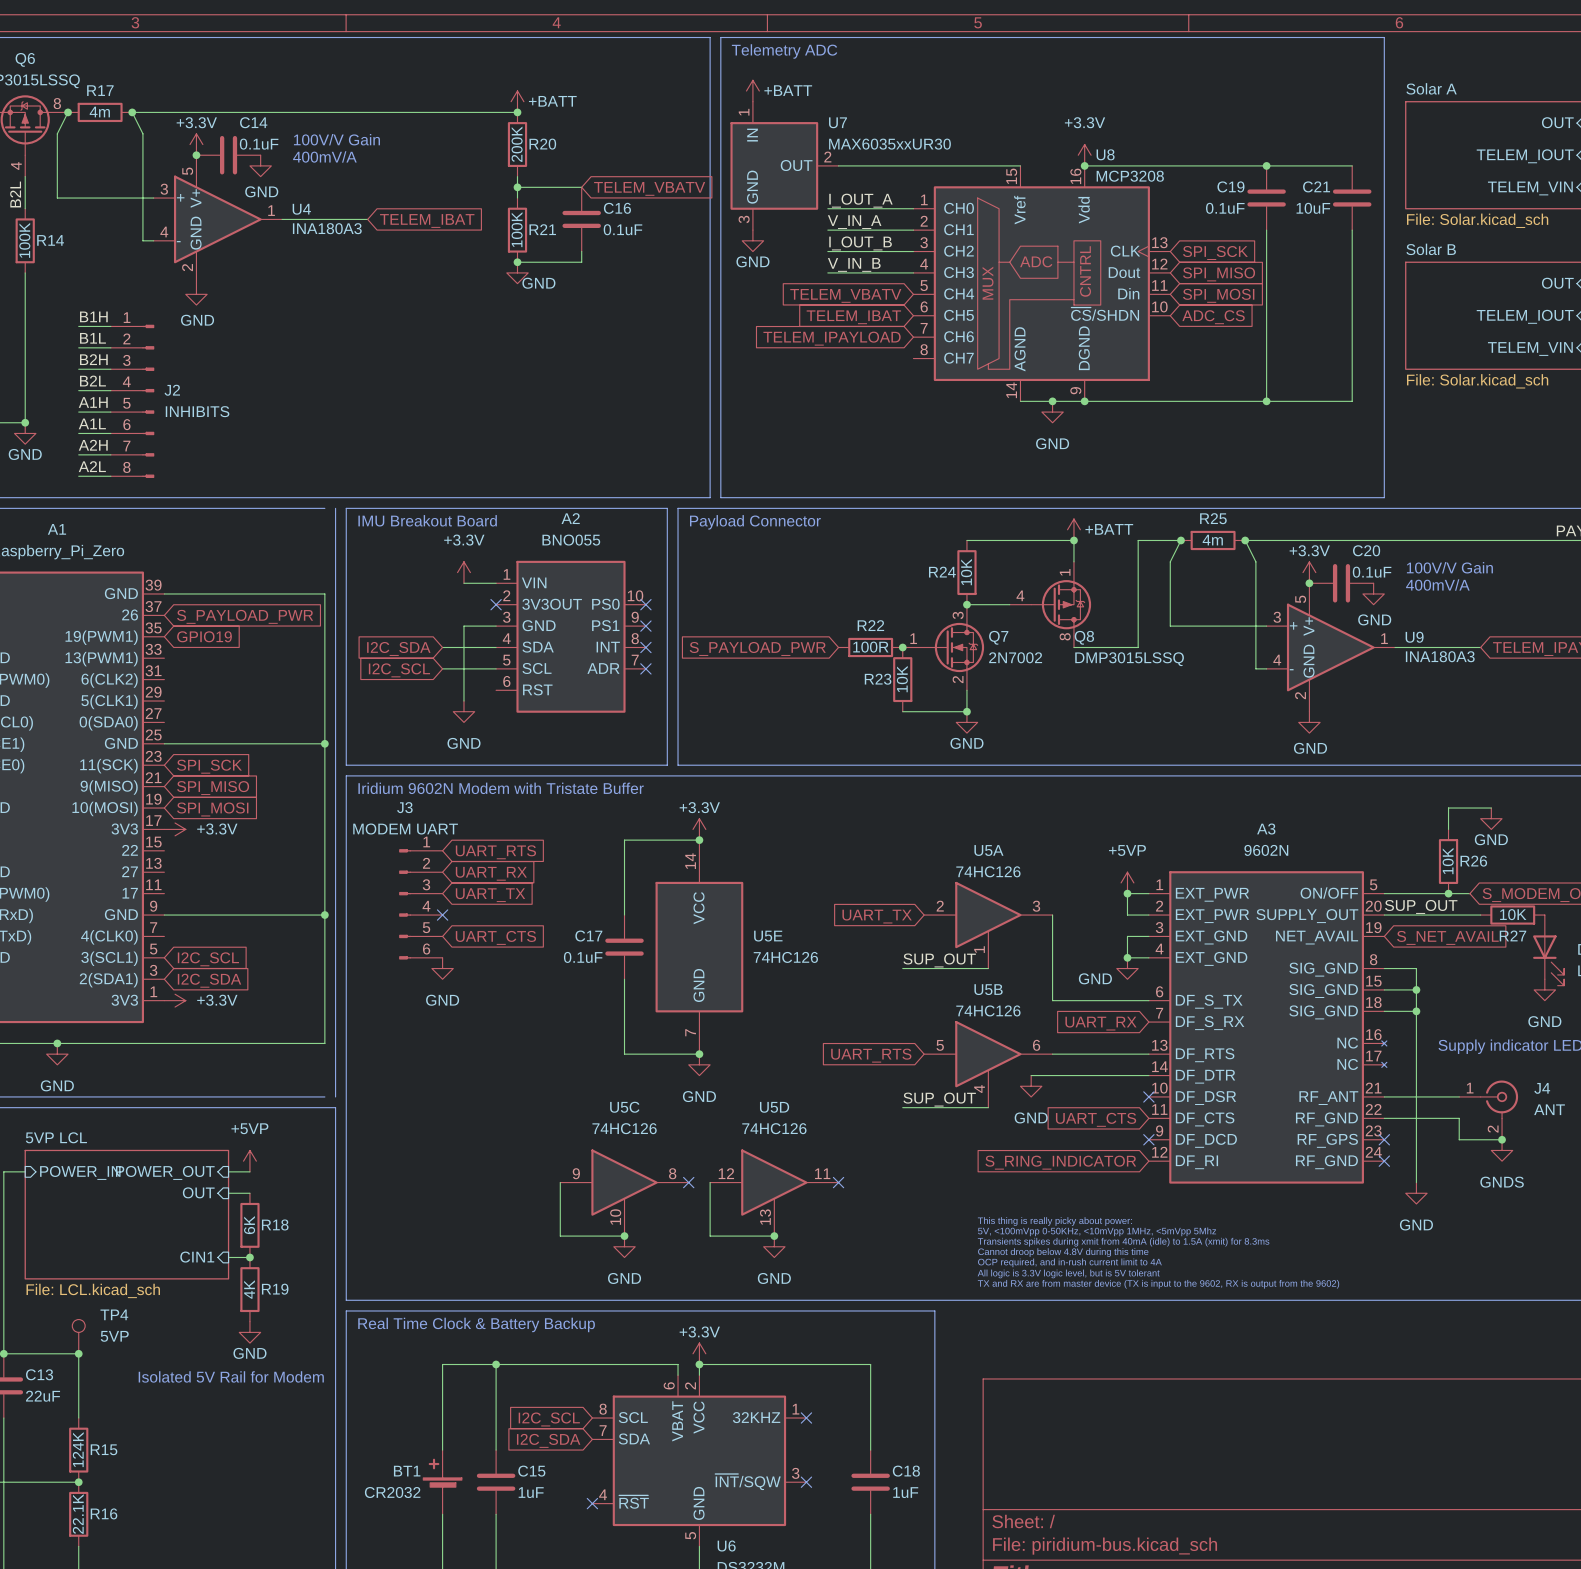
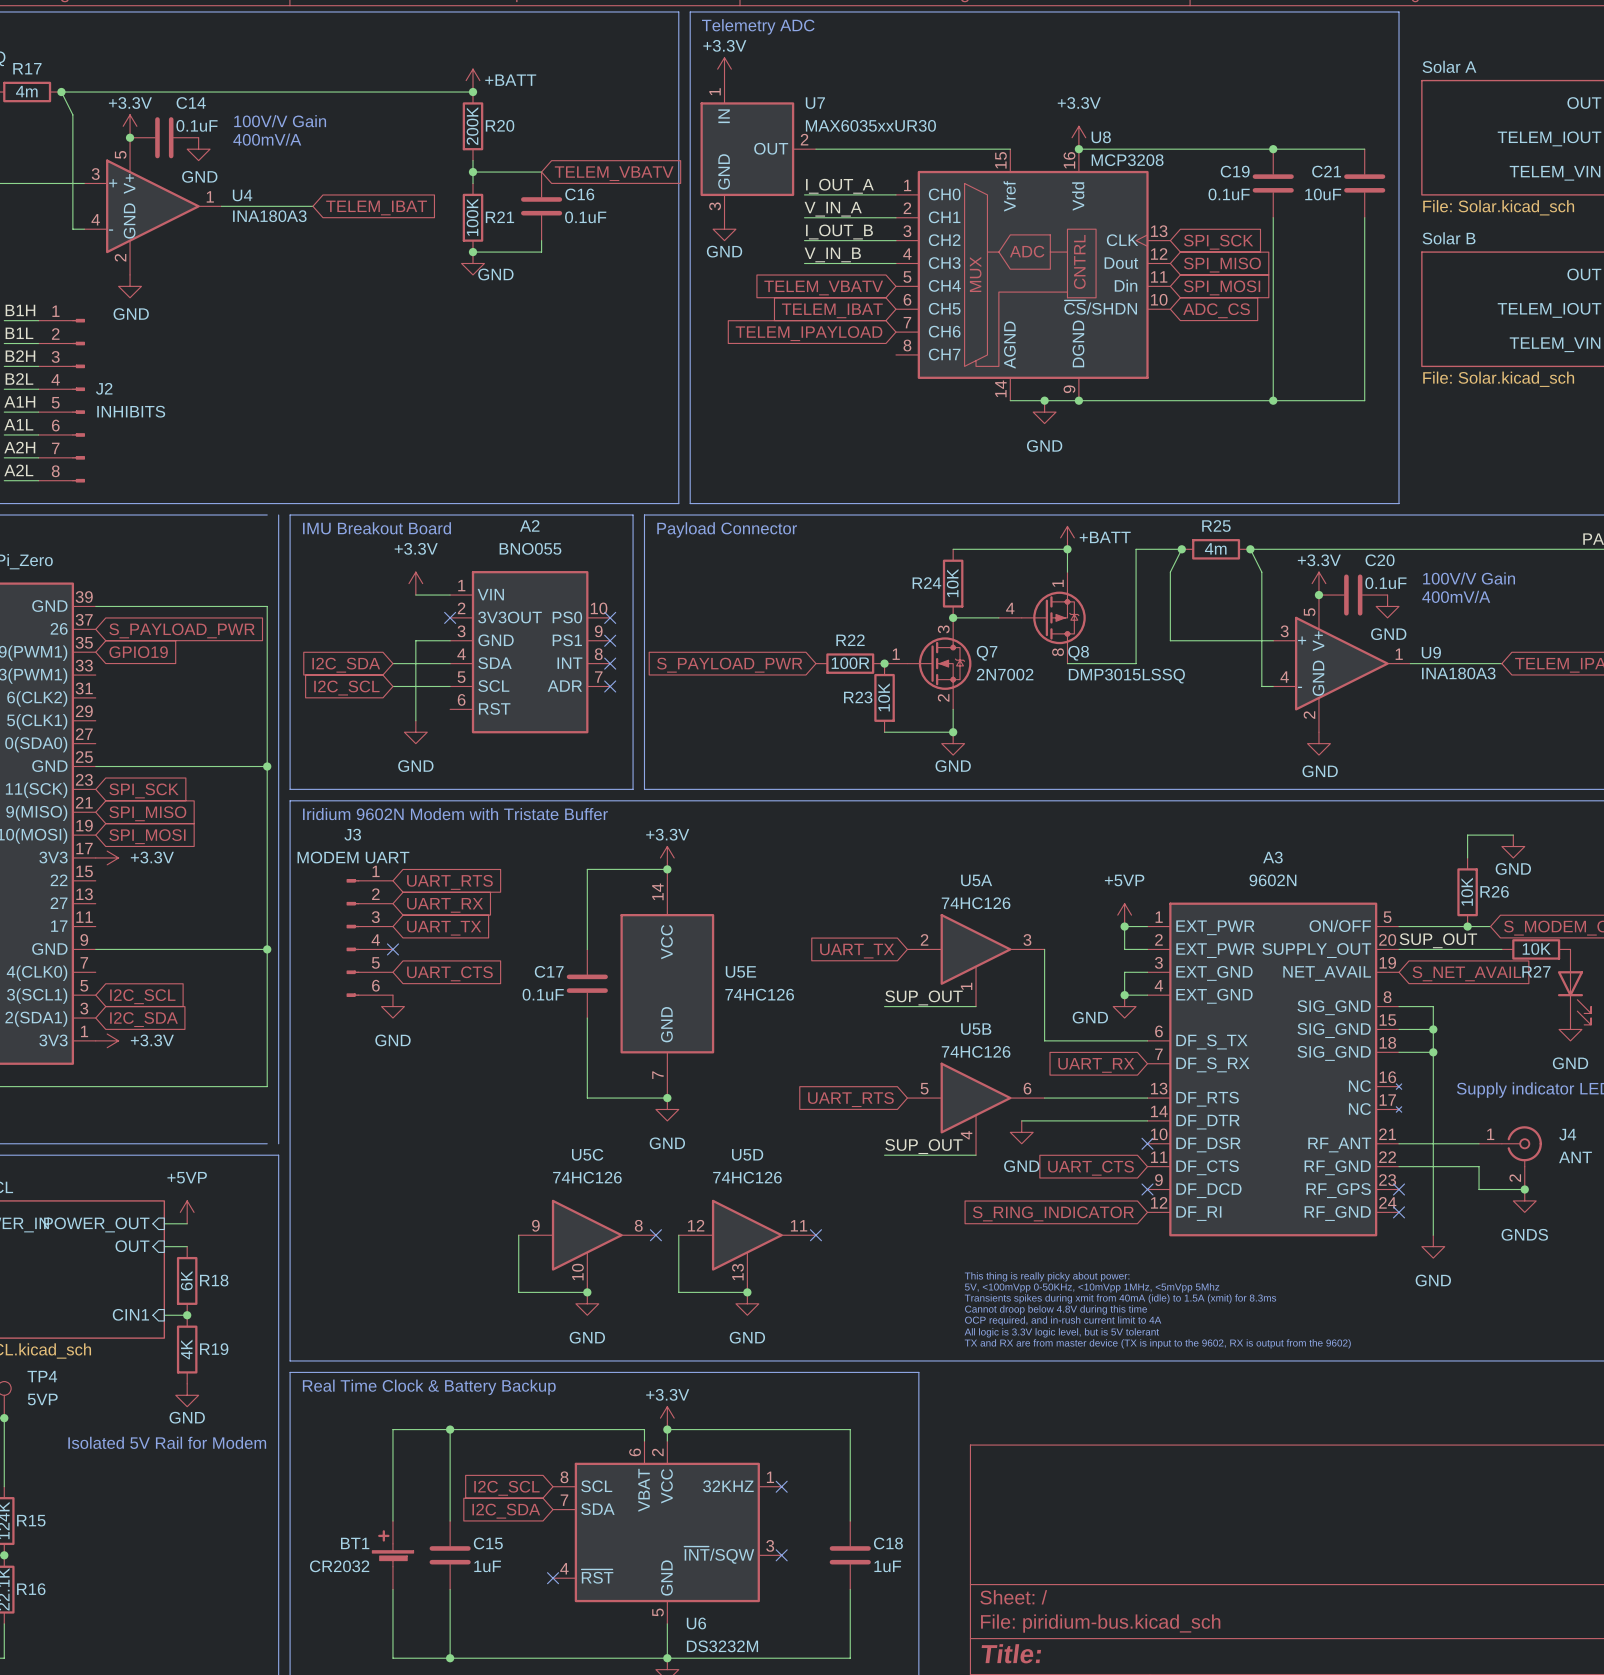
power symbol: +BATT (752, 91) -> +3.3V (724, 69)

